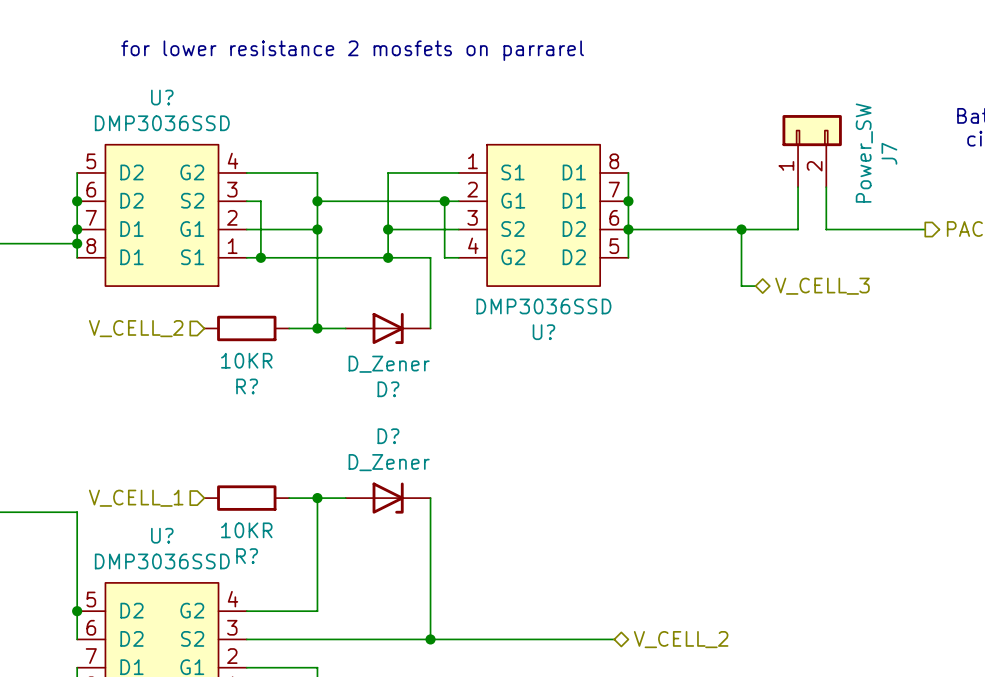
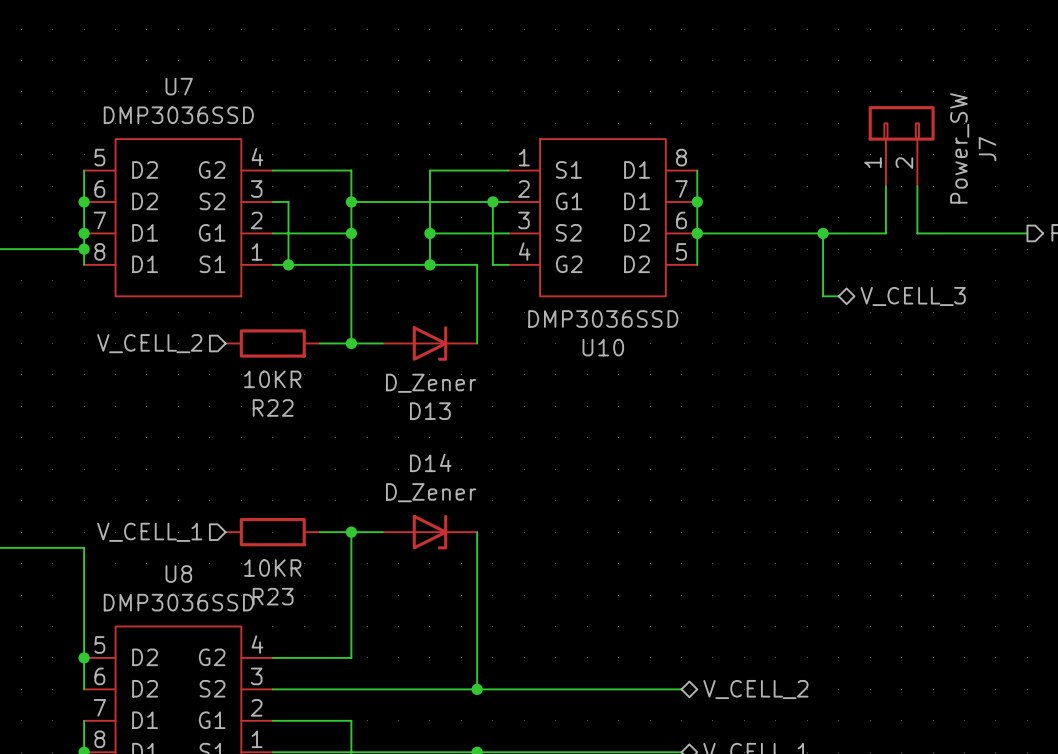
text: for lower resistance 2 mosfets on parrarel (352, 50) -> none
U? name: U? (162, 97) -> U7 (179, 86)
U? name: U? (543, 332) -> U10 (603, 347)
R? name: R? (247, 386) -> R22 (273, 407)
D? name: D? (388, 389) -> D13 (430, 411)
D? name: D? (388, 436) -> D14 (430, 462)
U? name: U? (162, 535) -> U8 (178, 574)
R? name: R? (247, 556) -> R23 (273, 596)

